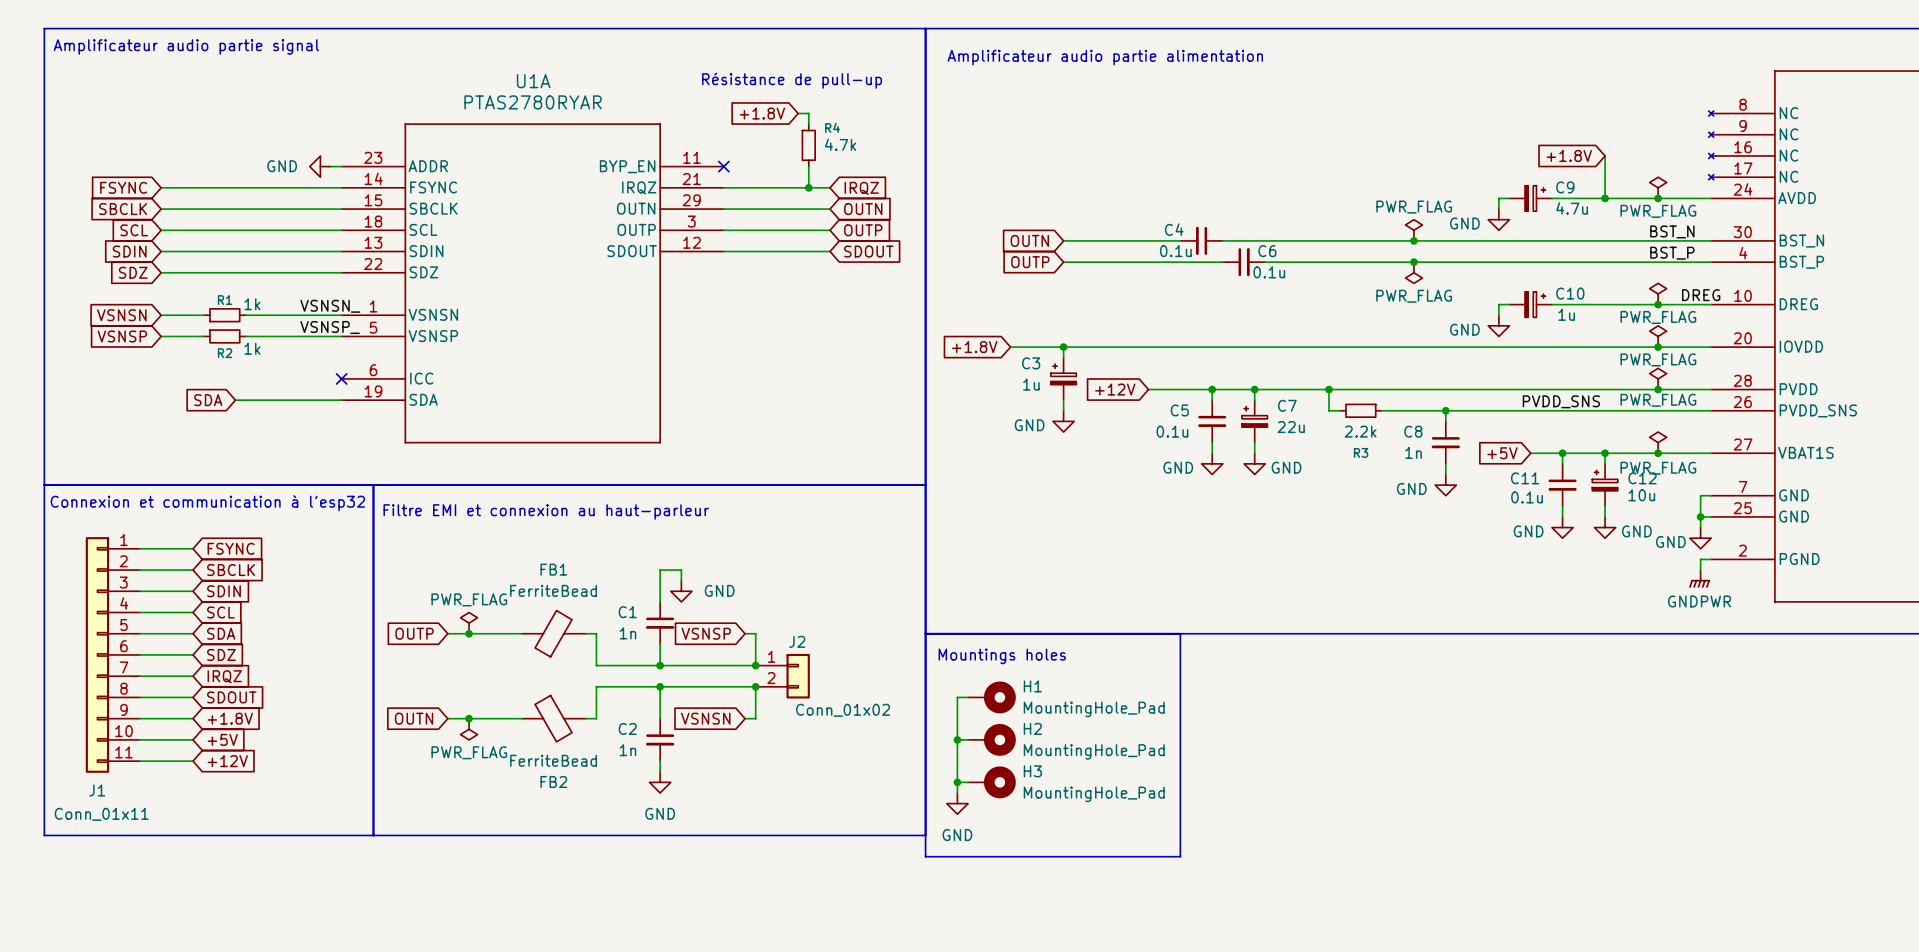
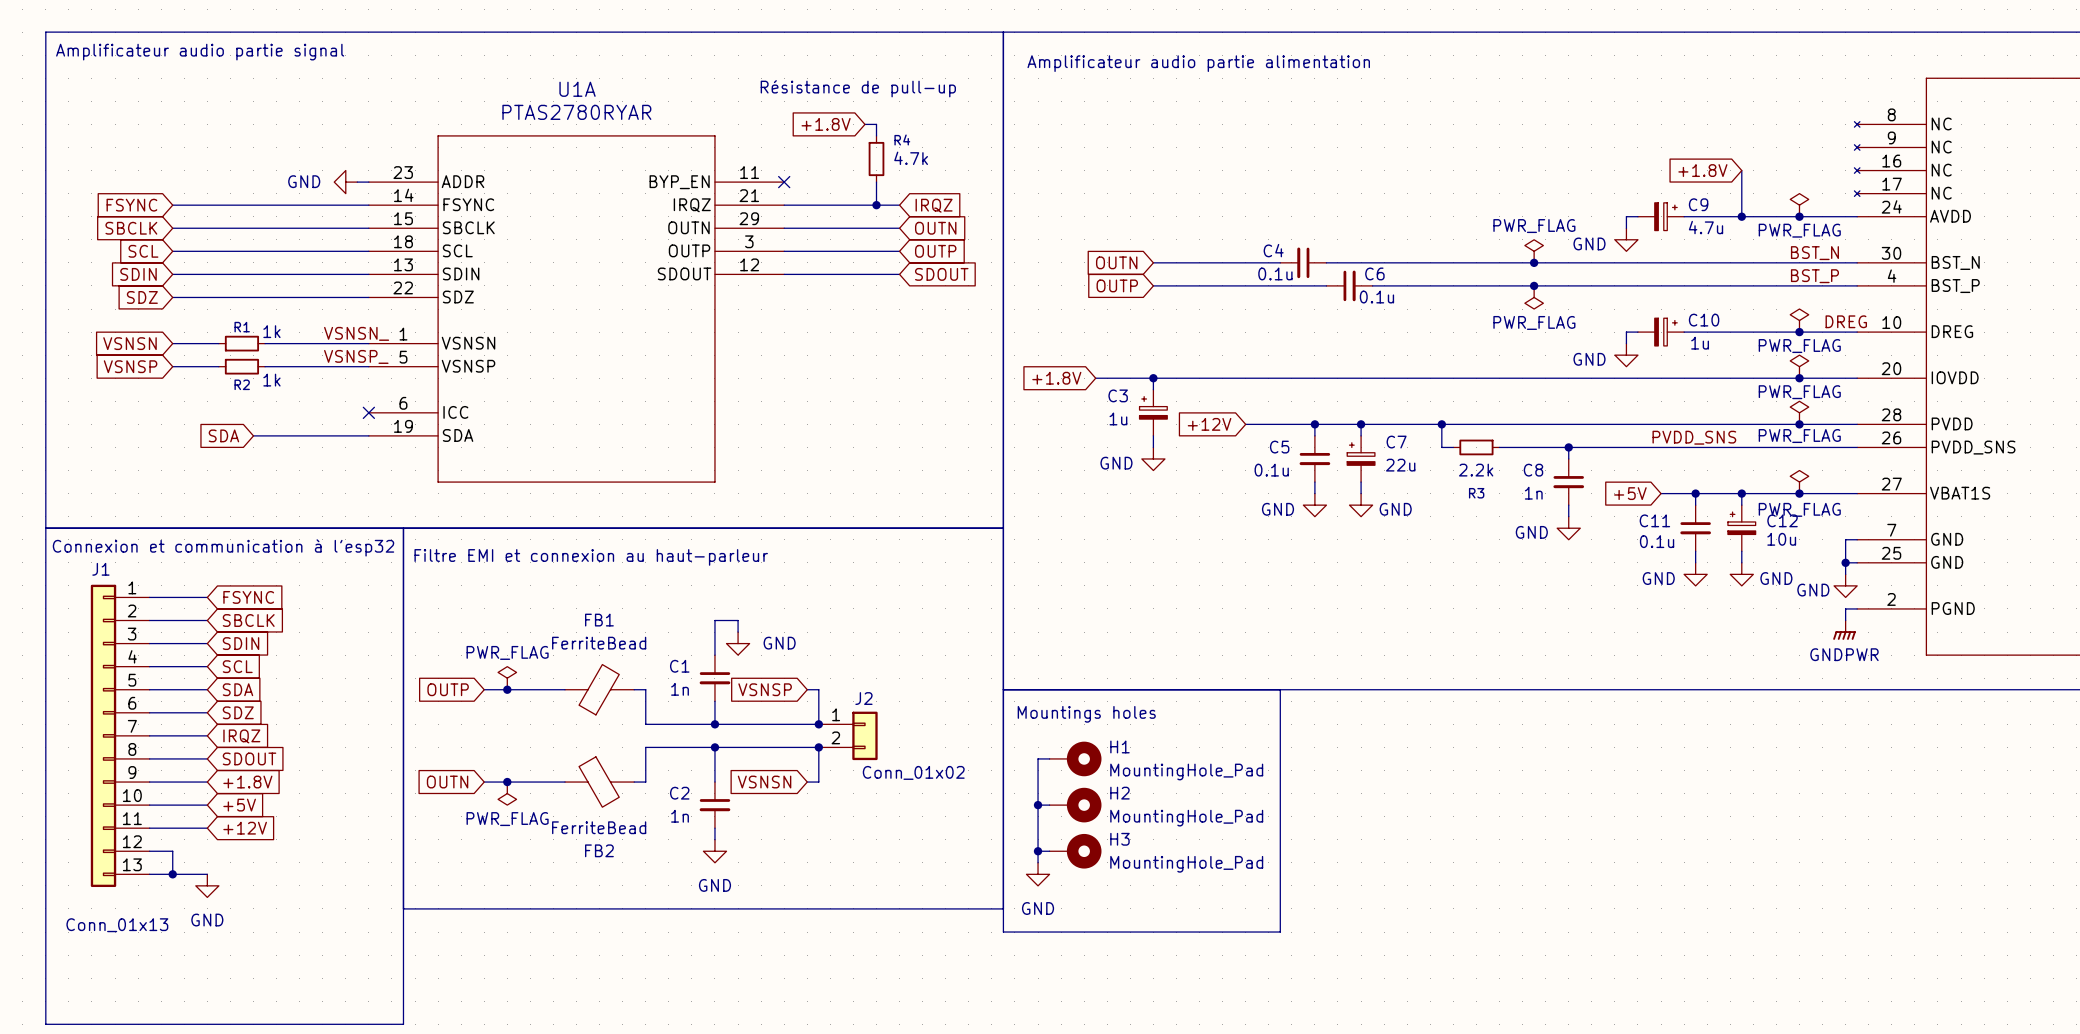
J1 symbol: [85, 537, 140, 773] -> [90, 584, 150, 888]
wire: none -> (149, 851) (172, 851) (172, 874)
J1 name position: J1 (97, 790) -> J1 (100, 569)
wire: none -> (149, 874) (207, 874)
junction: none -> (172, 874)
J1 value: Conn_01x11 (101, 814) -> Conn_01x13 (117, 925)
power symbol: none -> GND (207, 885)
line: (44, 835) (373, 835) -> (45, 908) (45, 1024) (403, 1024) (403, 908)

